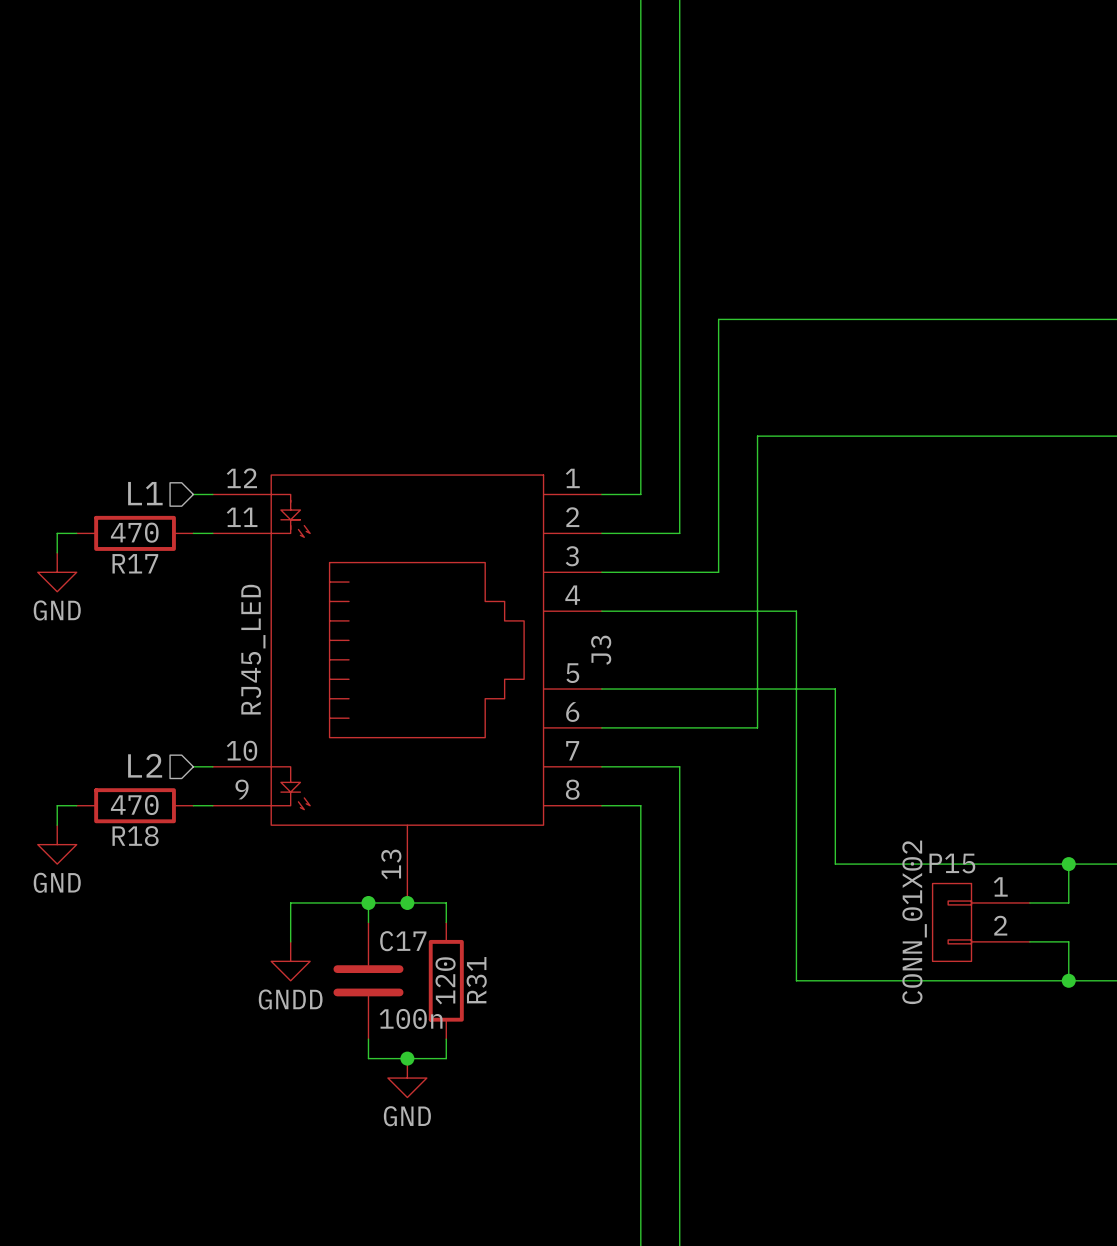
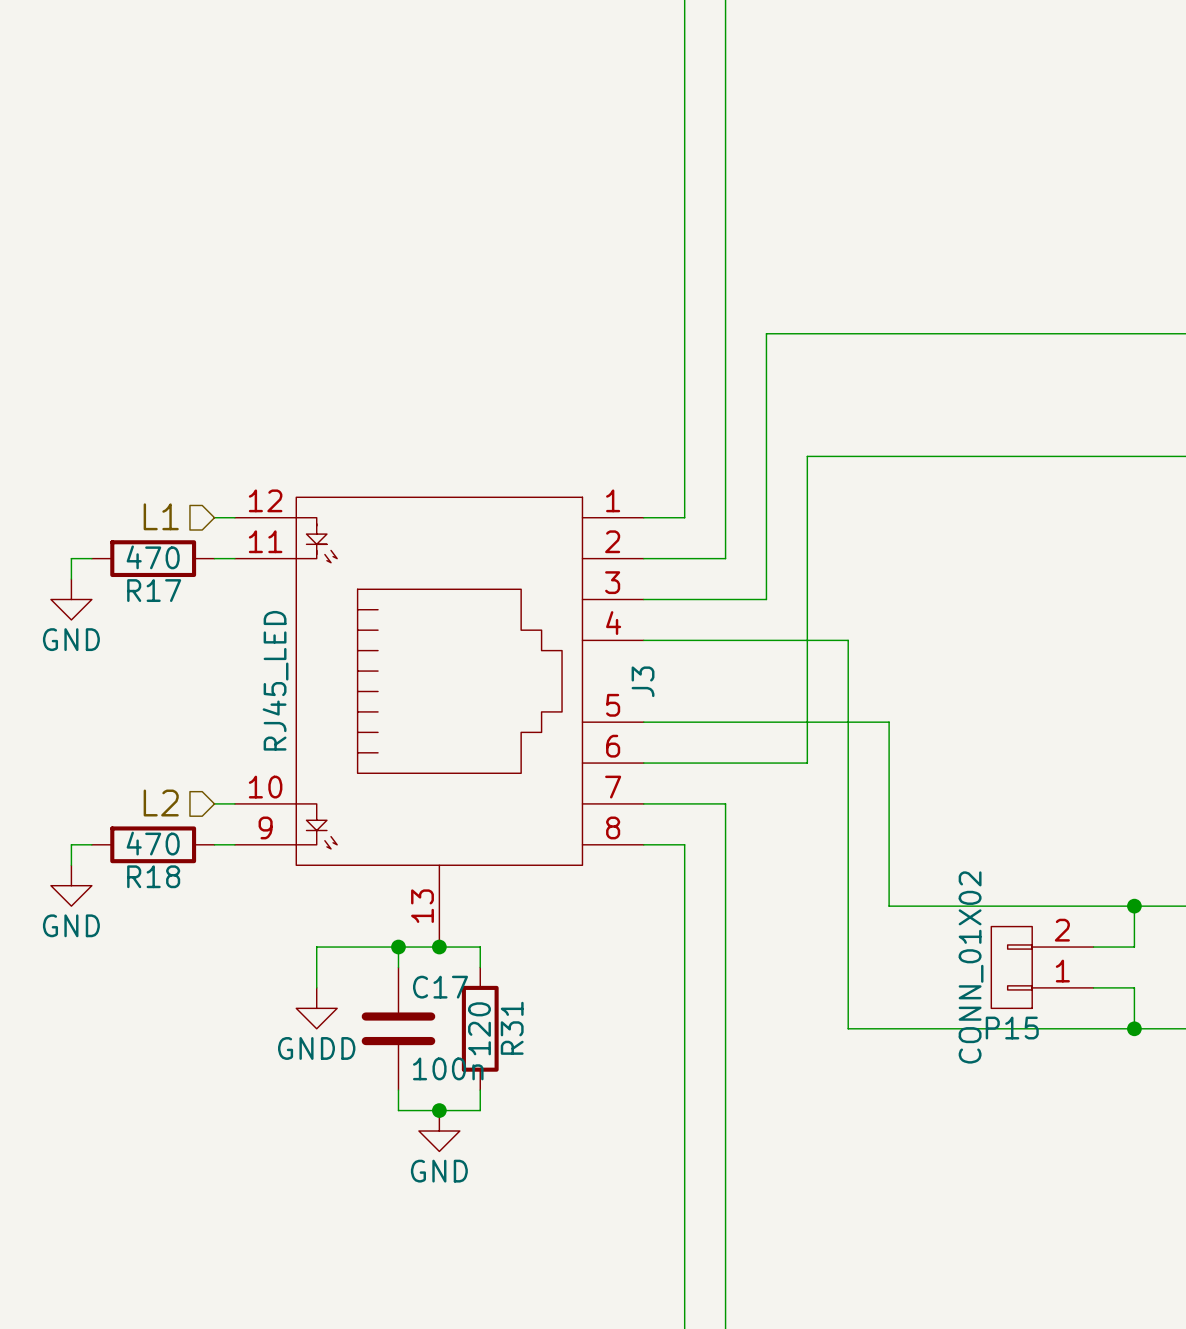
P15 flip: as is (952, 922) -> up-down (1011, 967)

